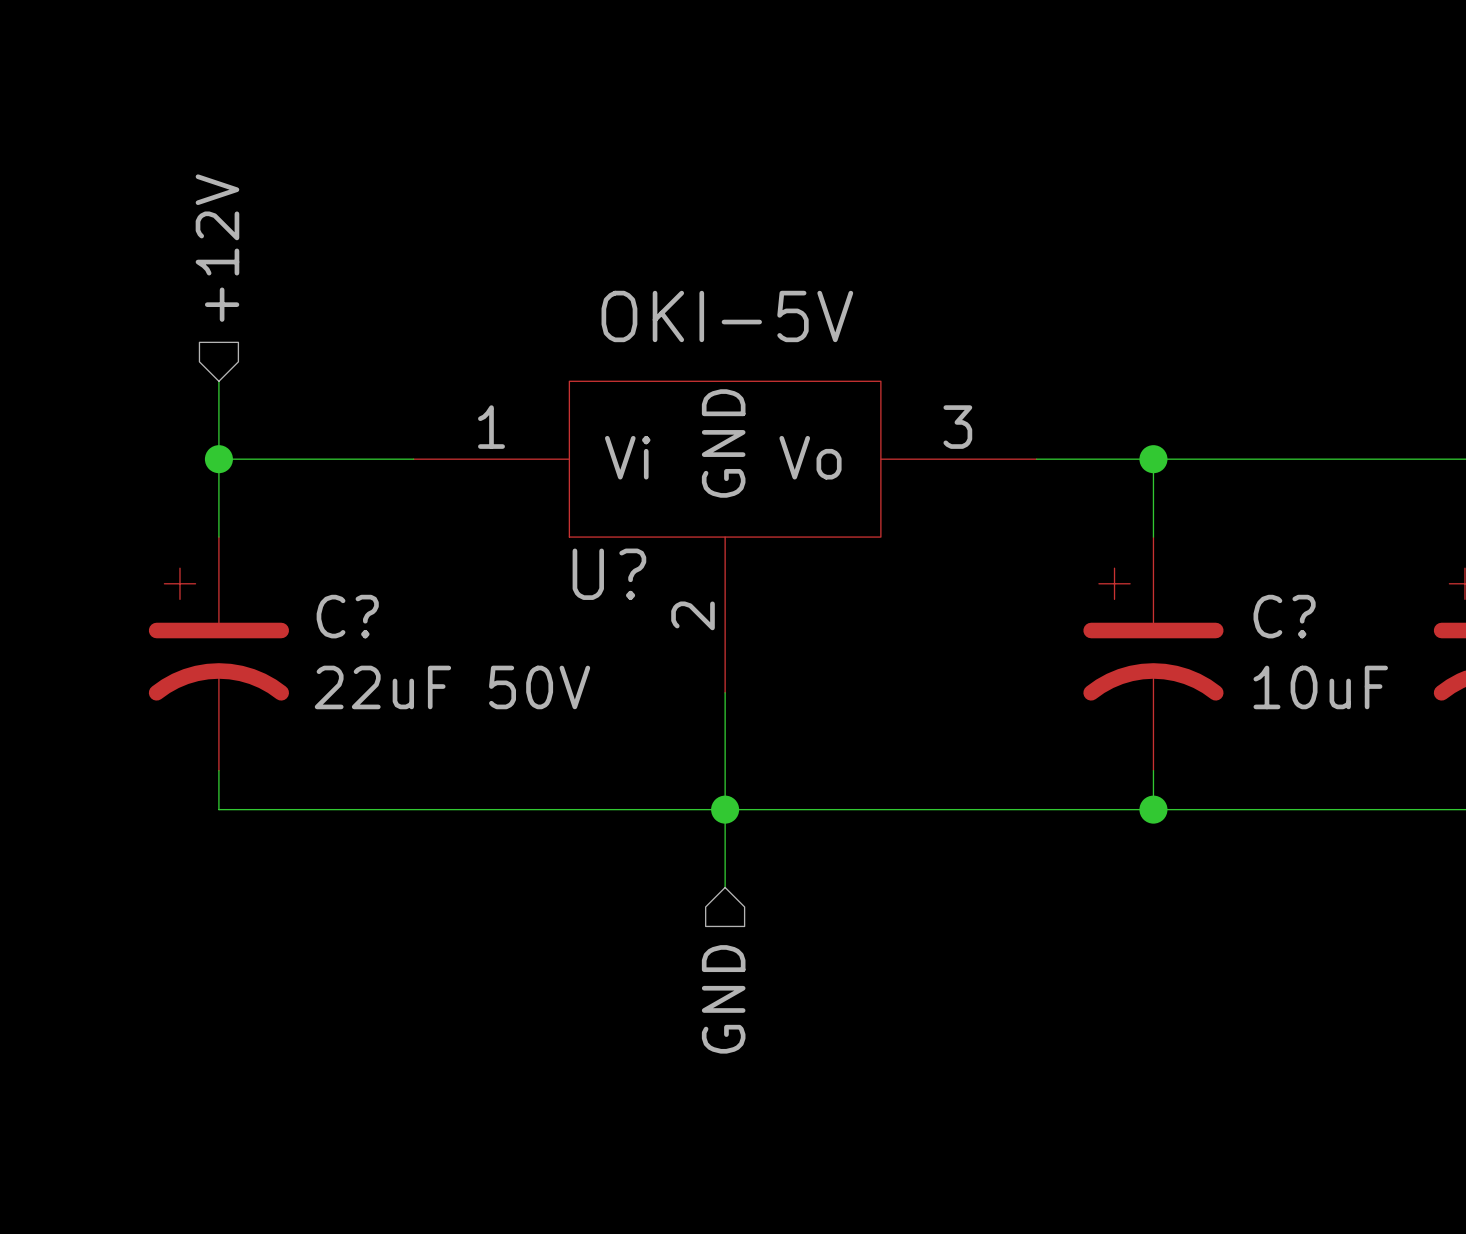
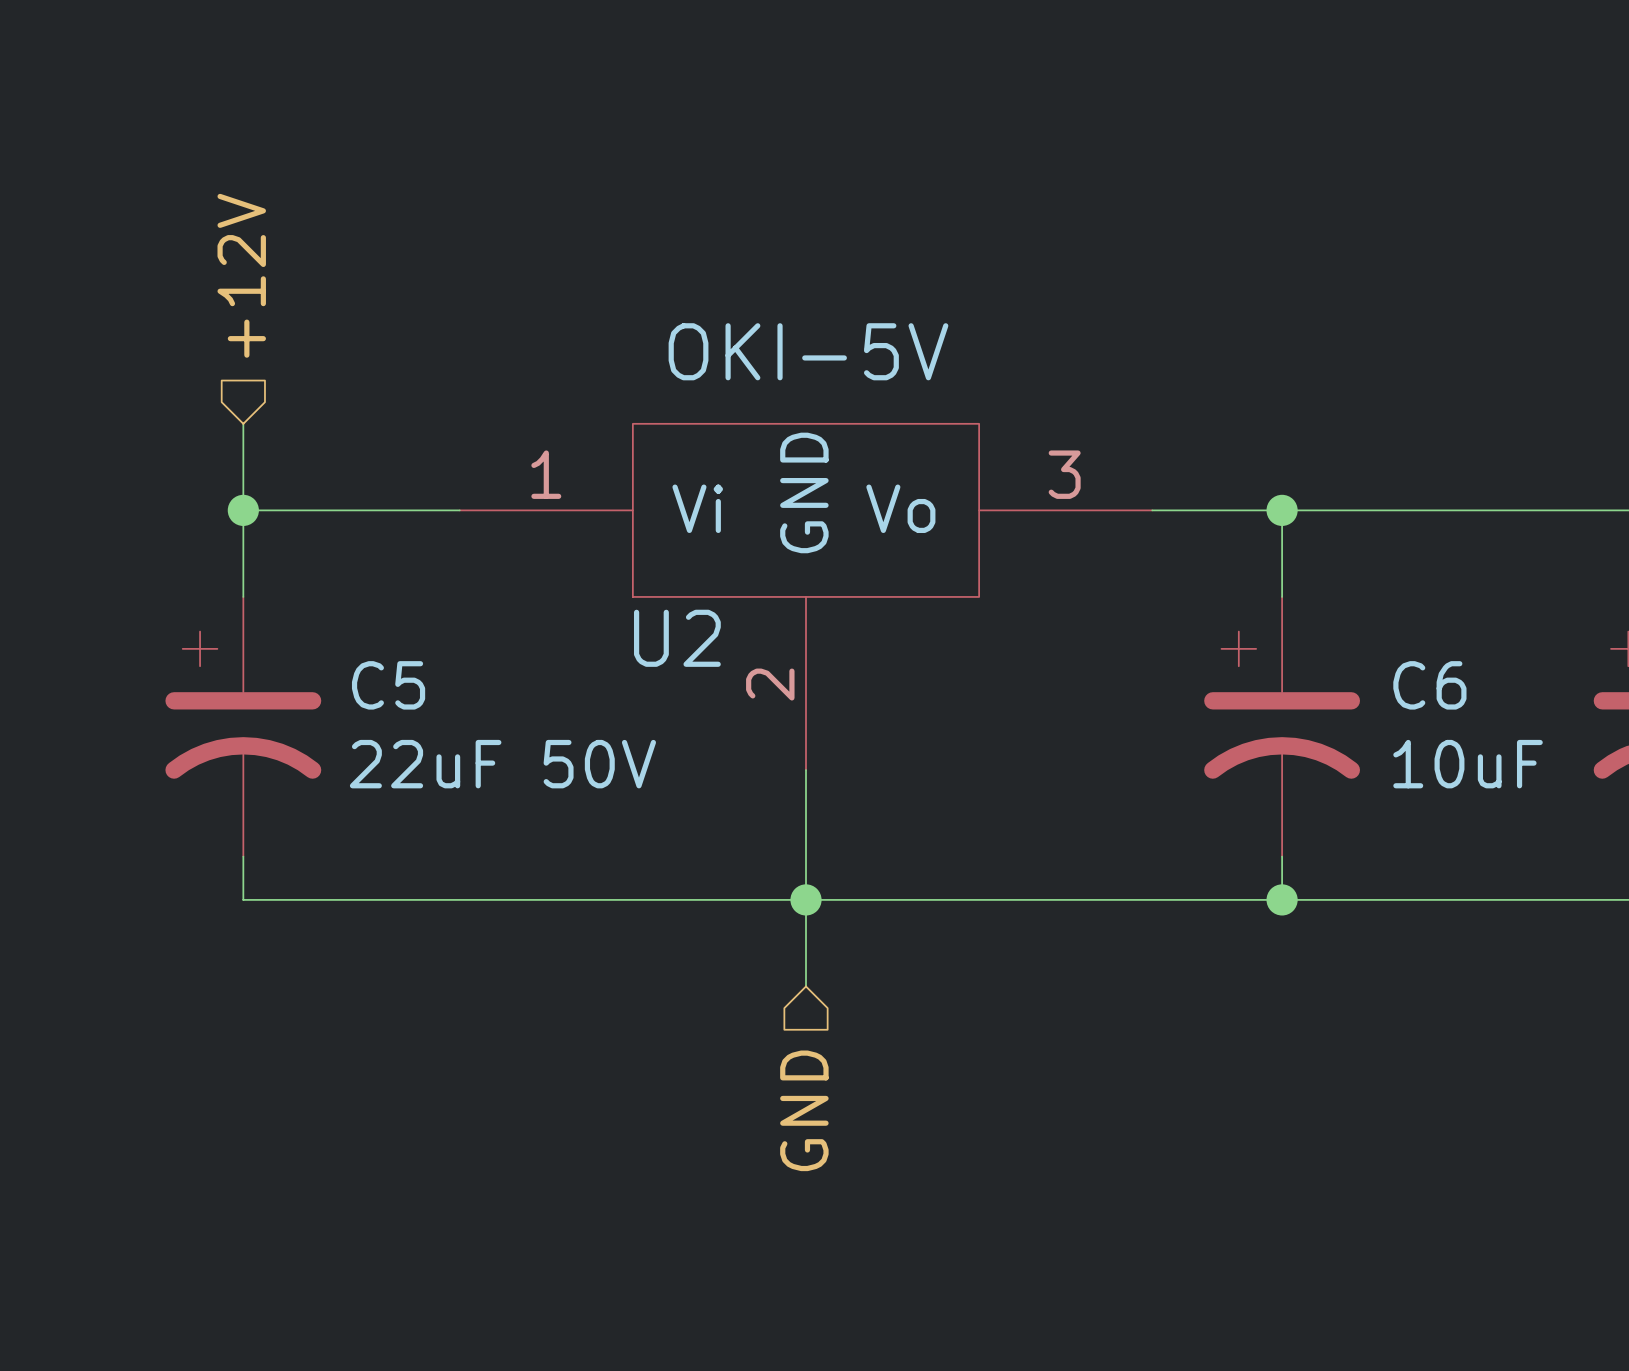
U? name: U? (609, 574) -> U2 (677, 638)
C? name: C? (347, 616) -> C5 (388, 685)
C? name: C? (1284, 616) -> C6 (1429, 685)

